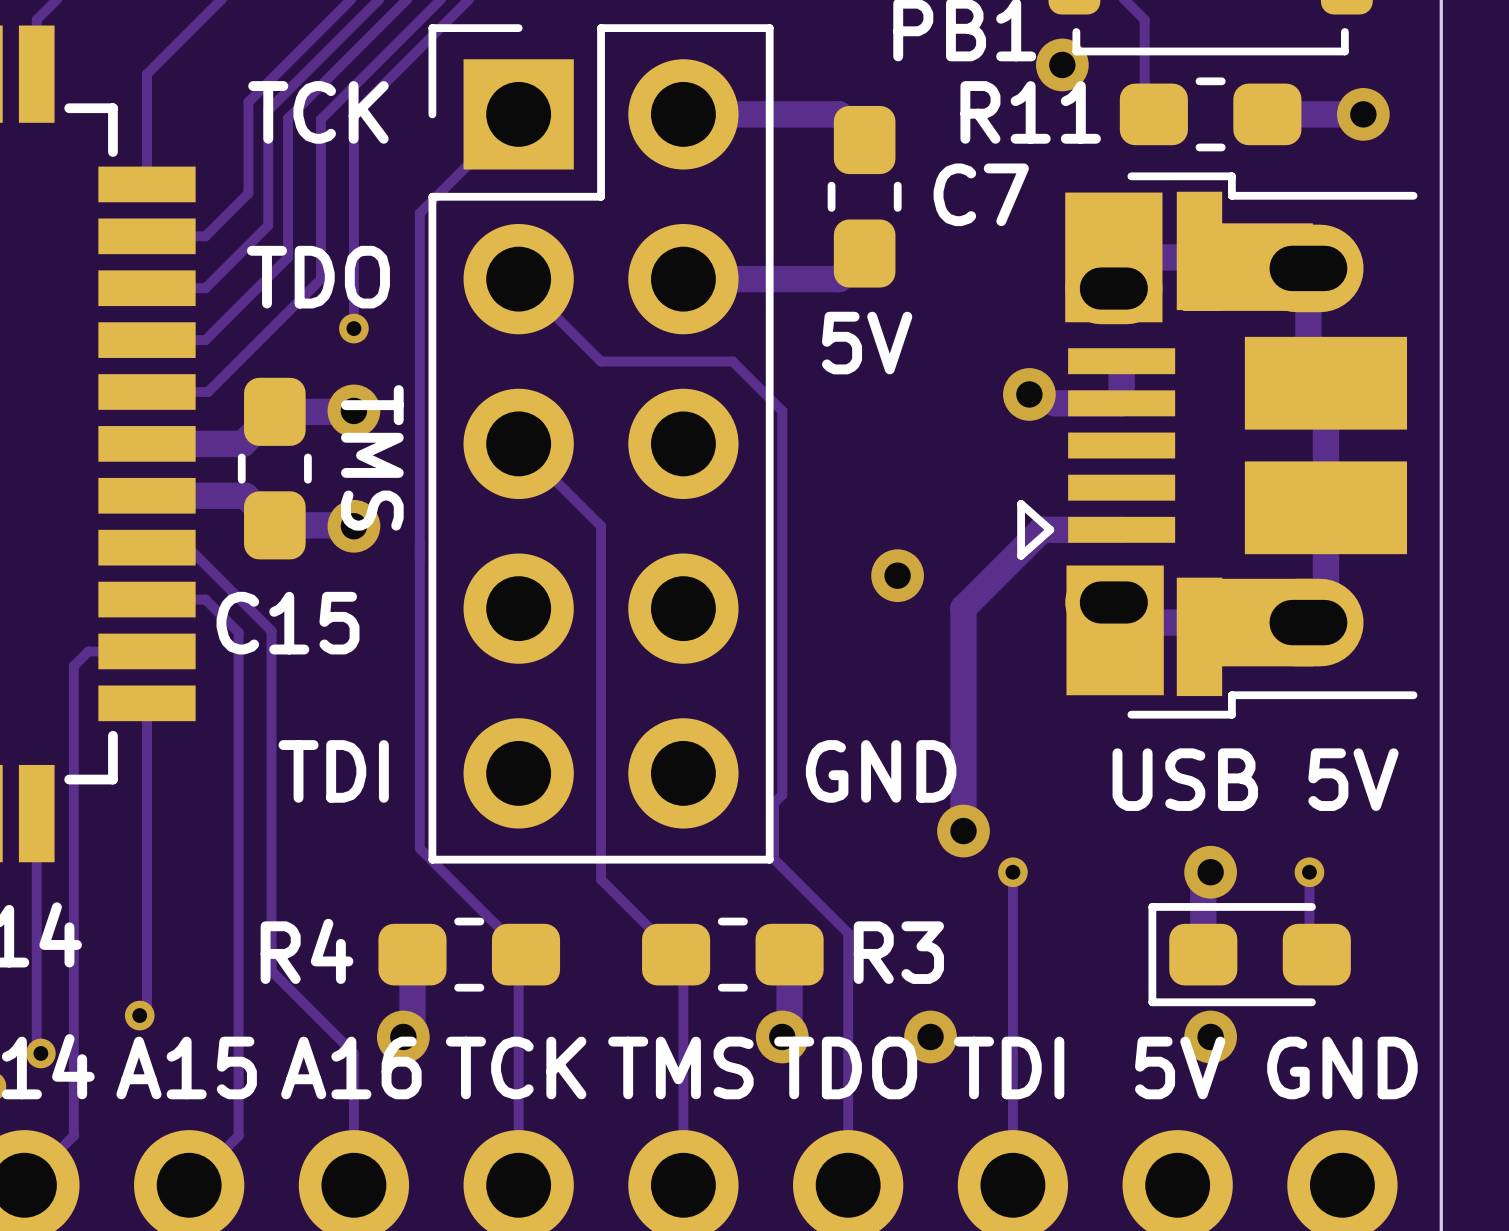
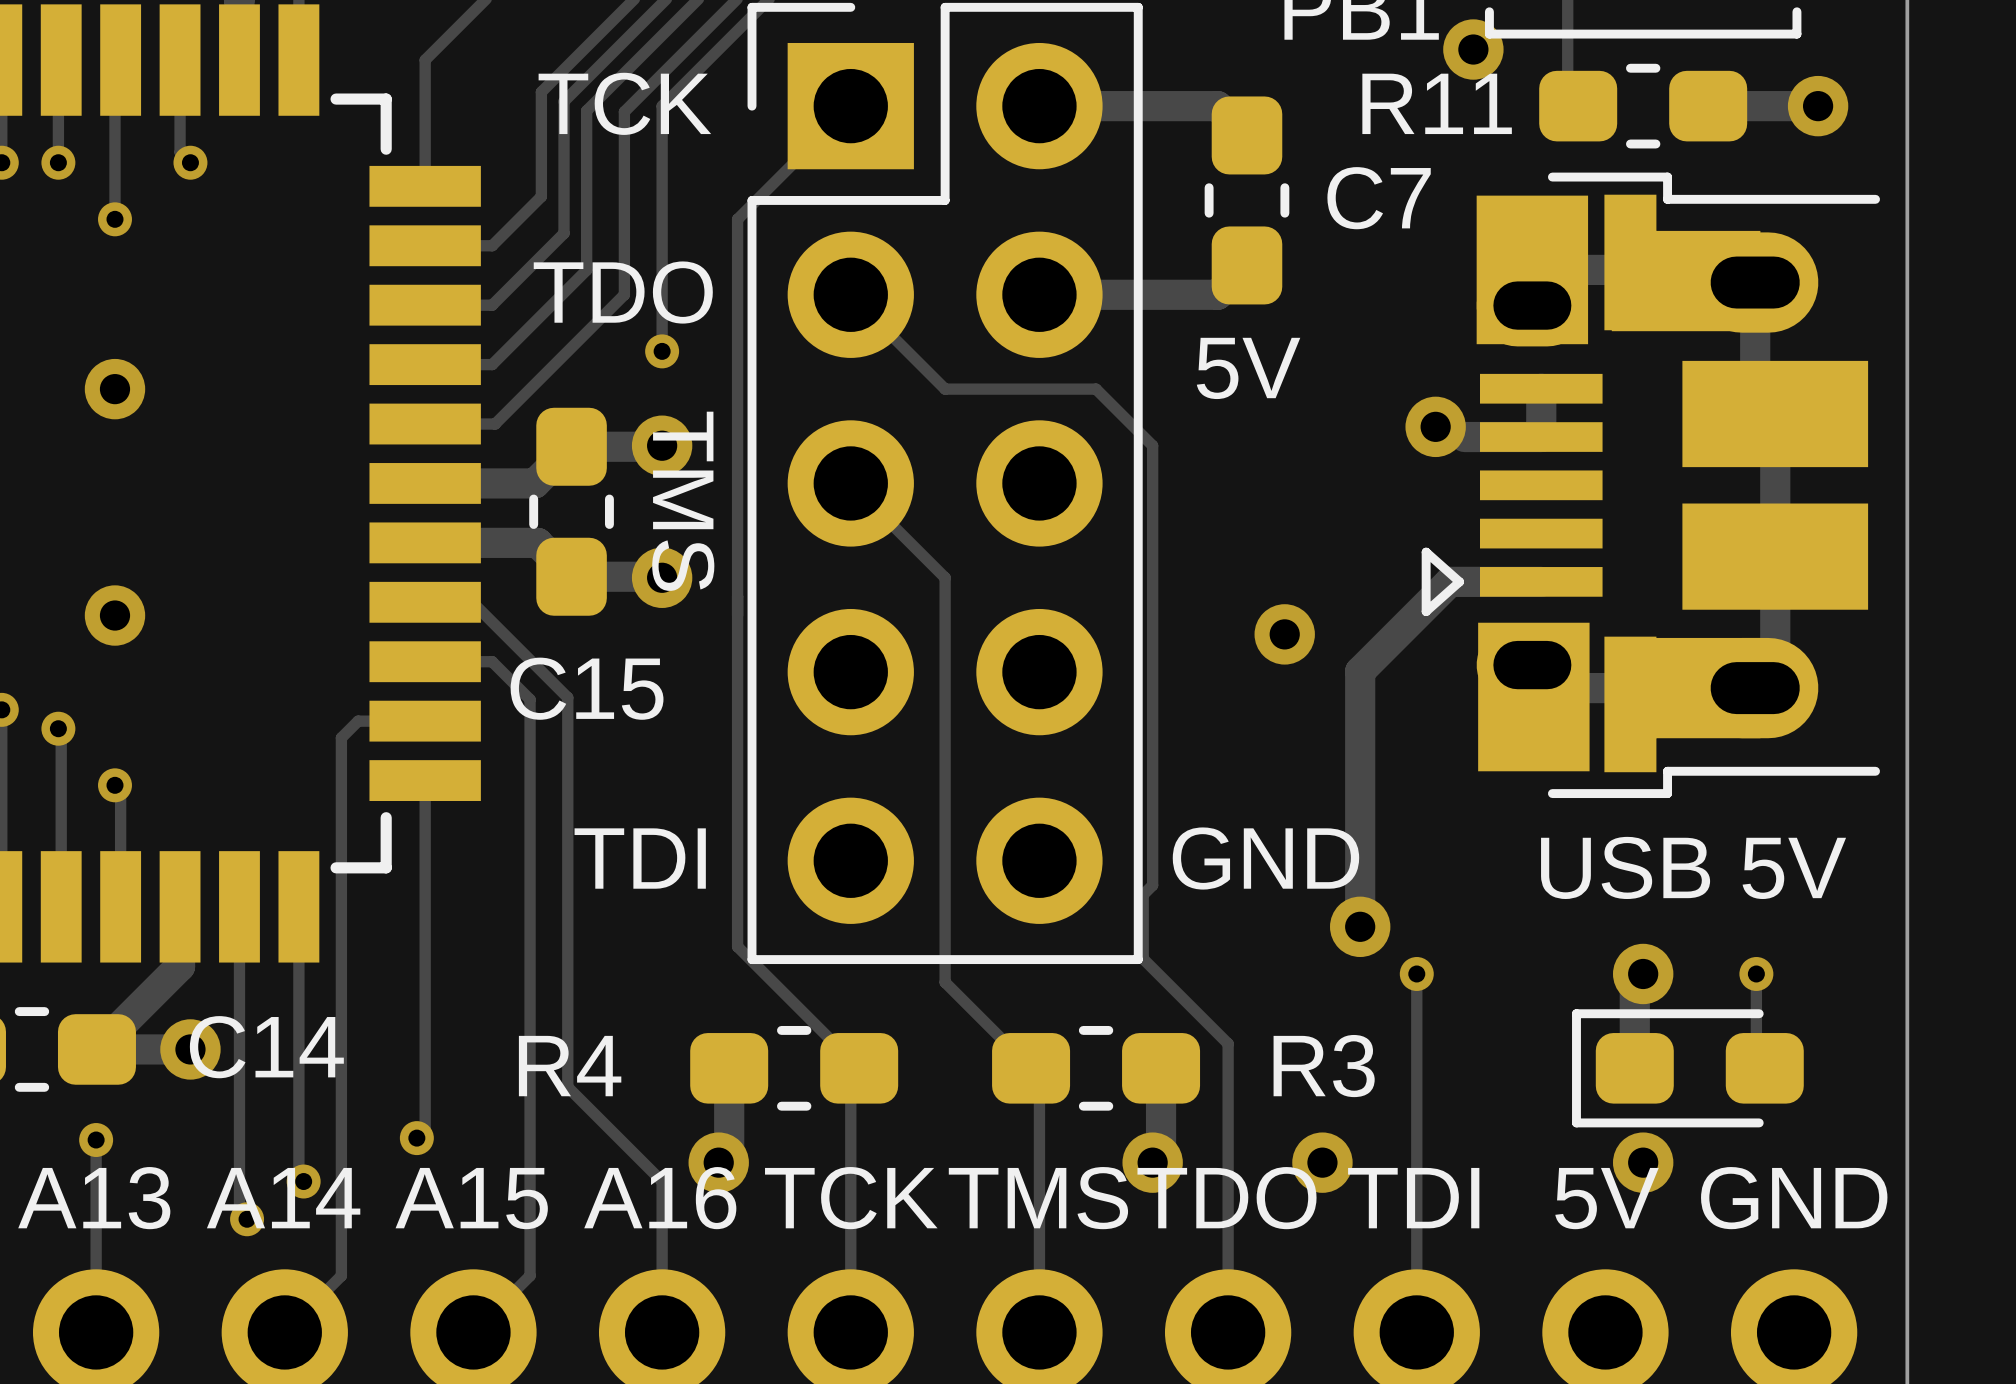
R4 name position: R4 (307, 951) -> R4 (570, 1066)
R3 name position: R3 (898, 952) -> R3 (1324, 1066)

